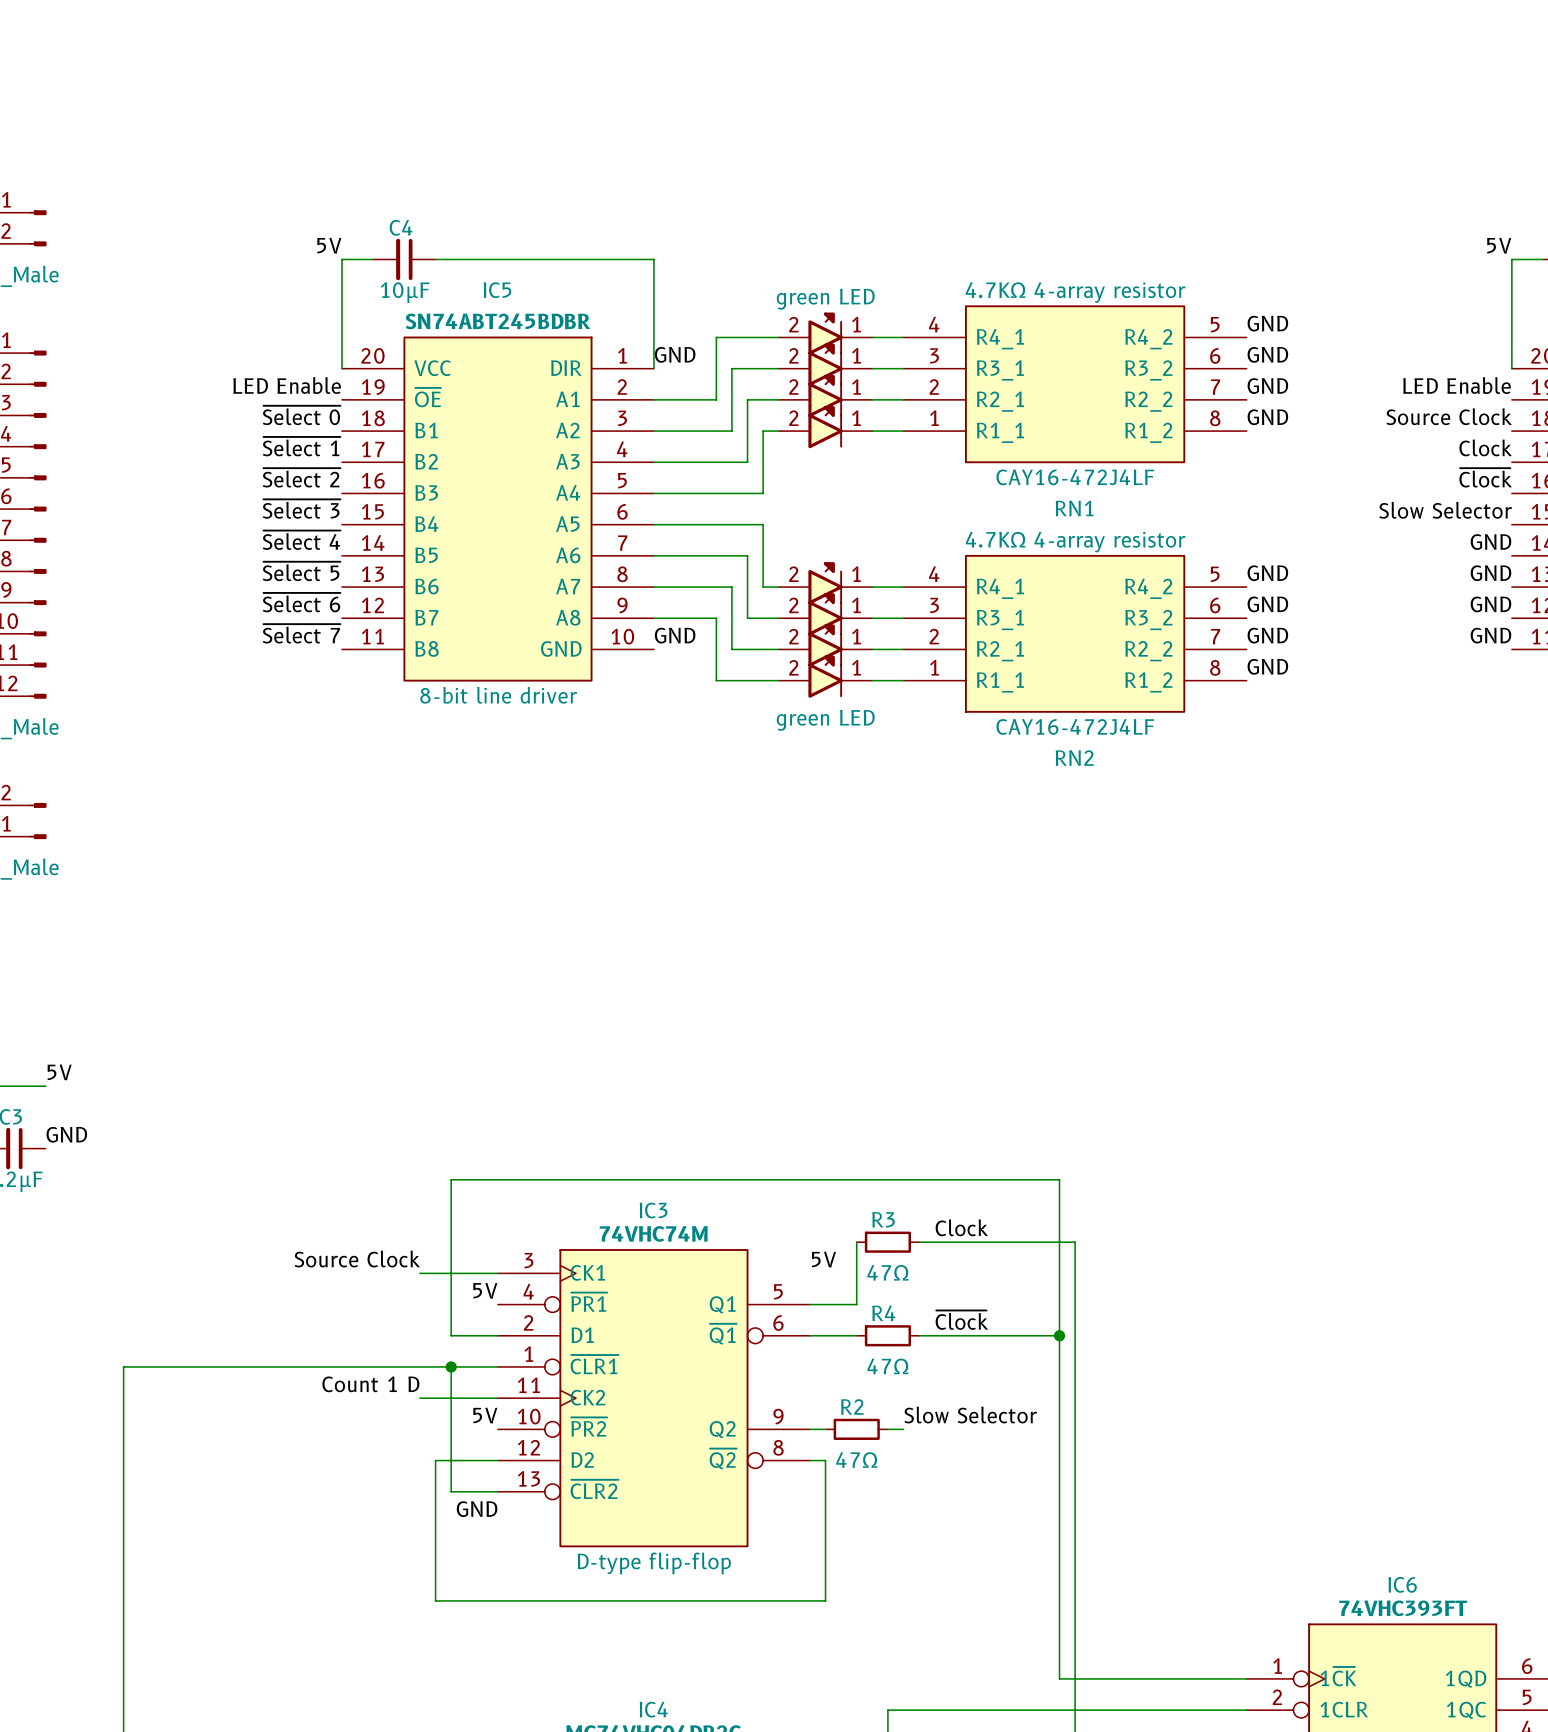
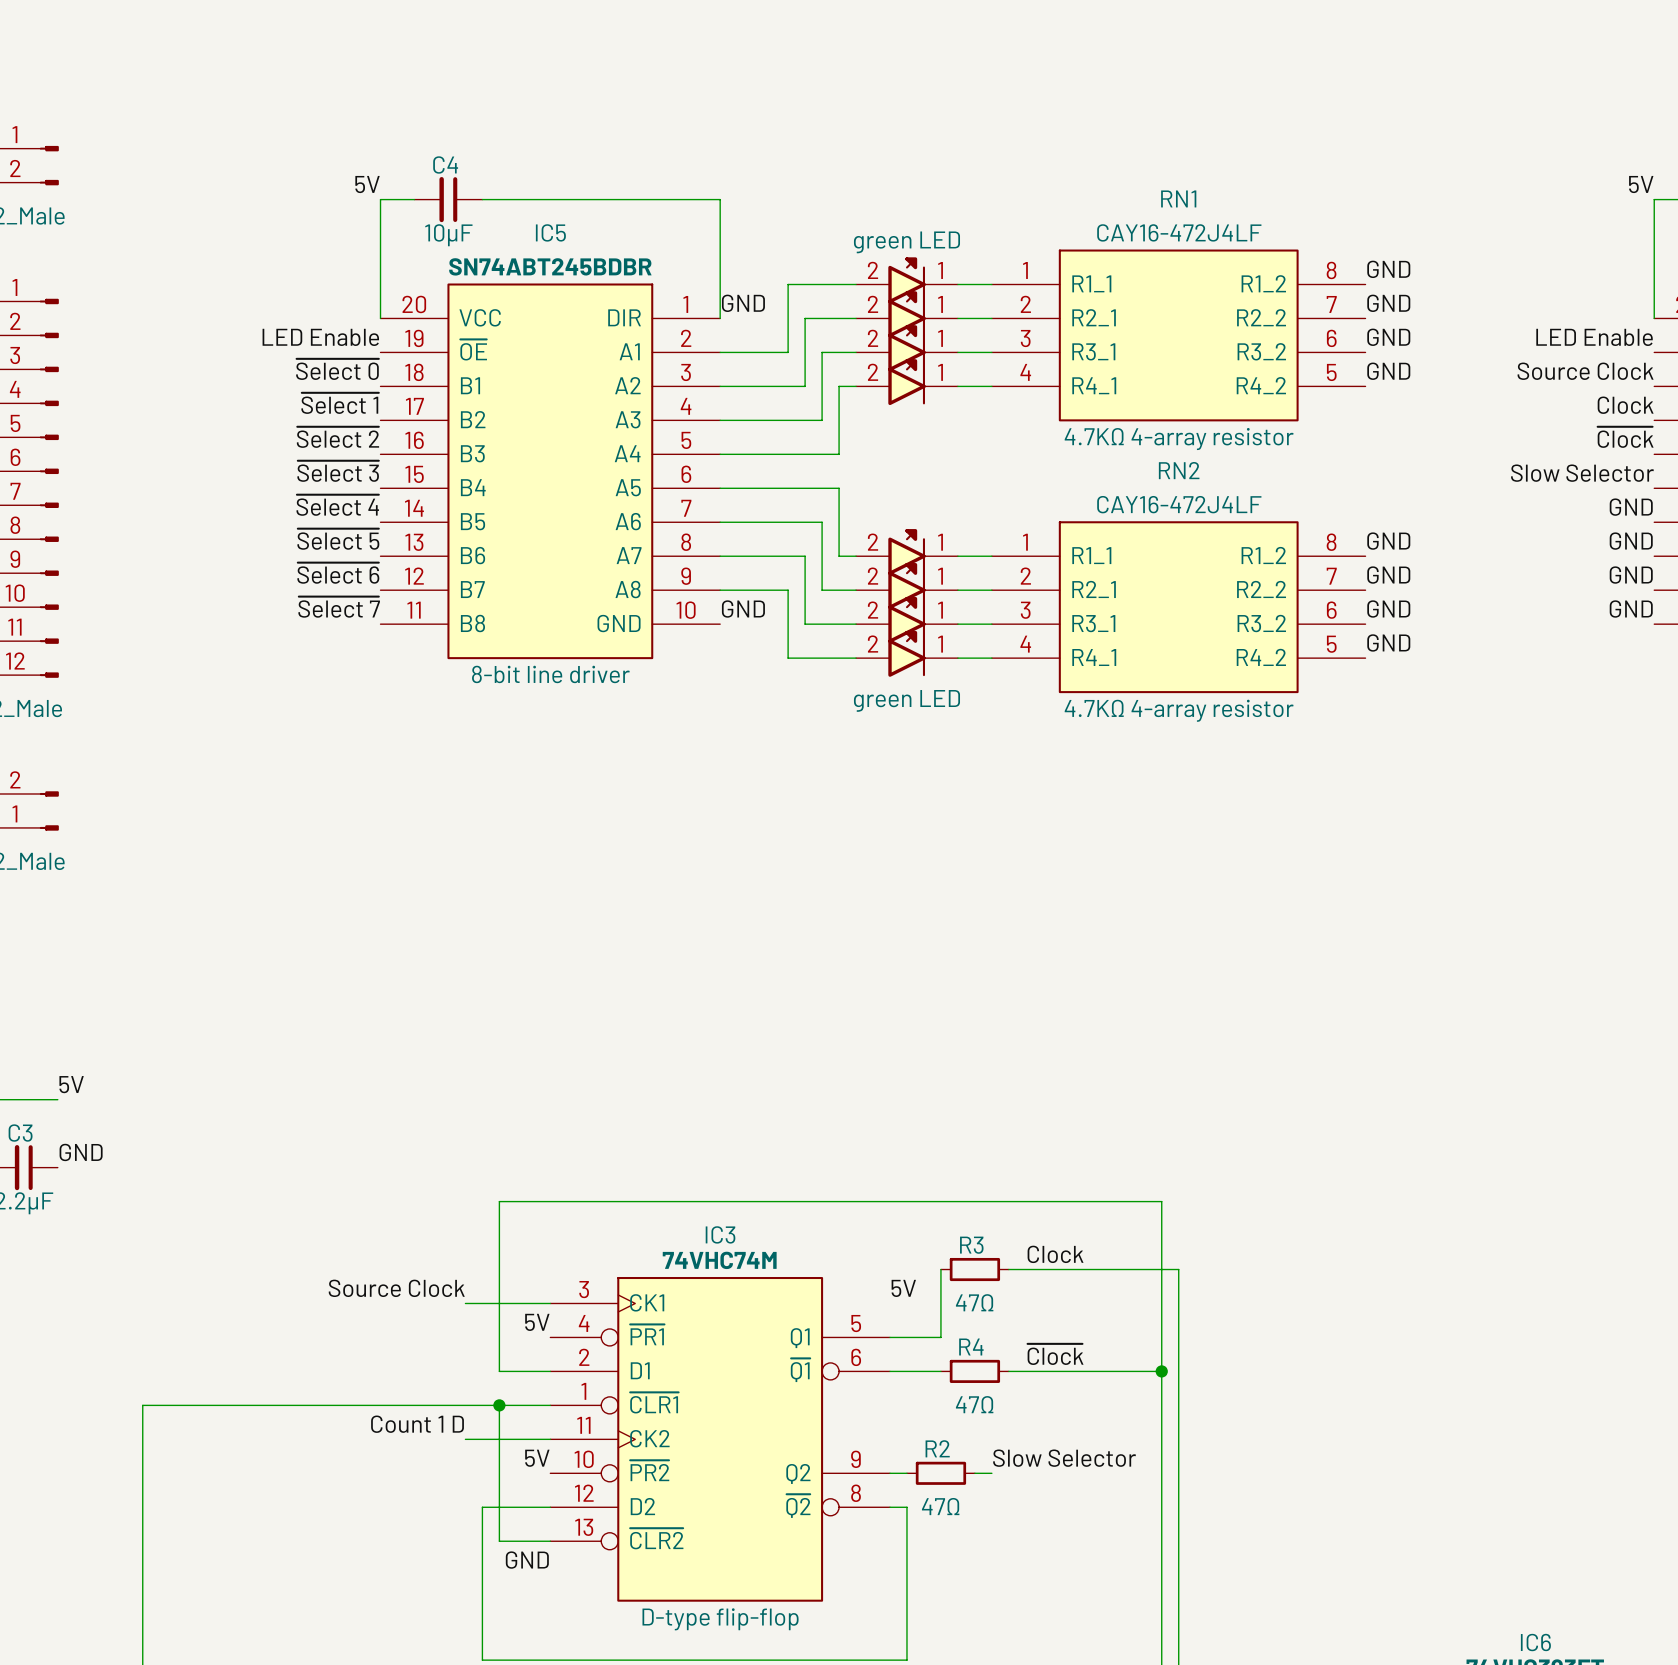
RN1 flip: as is (1075, 384) -> up-down (1178, 335)
RN2 flip: as is (1075, 633) -> up-down (1178, 607)

